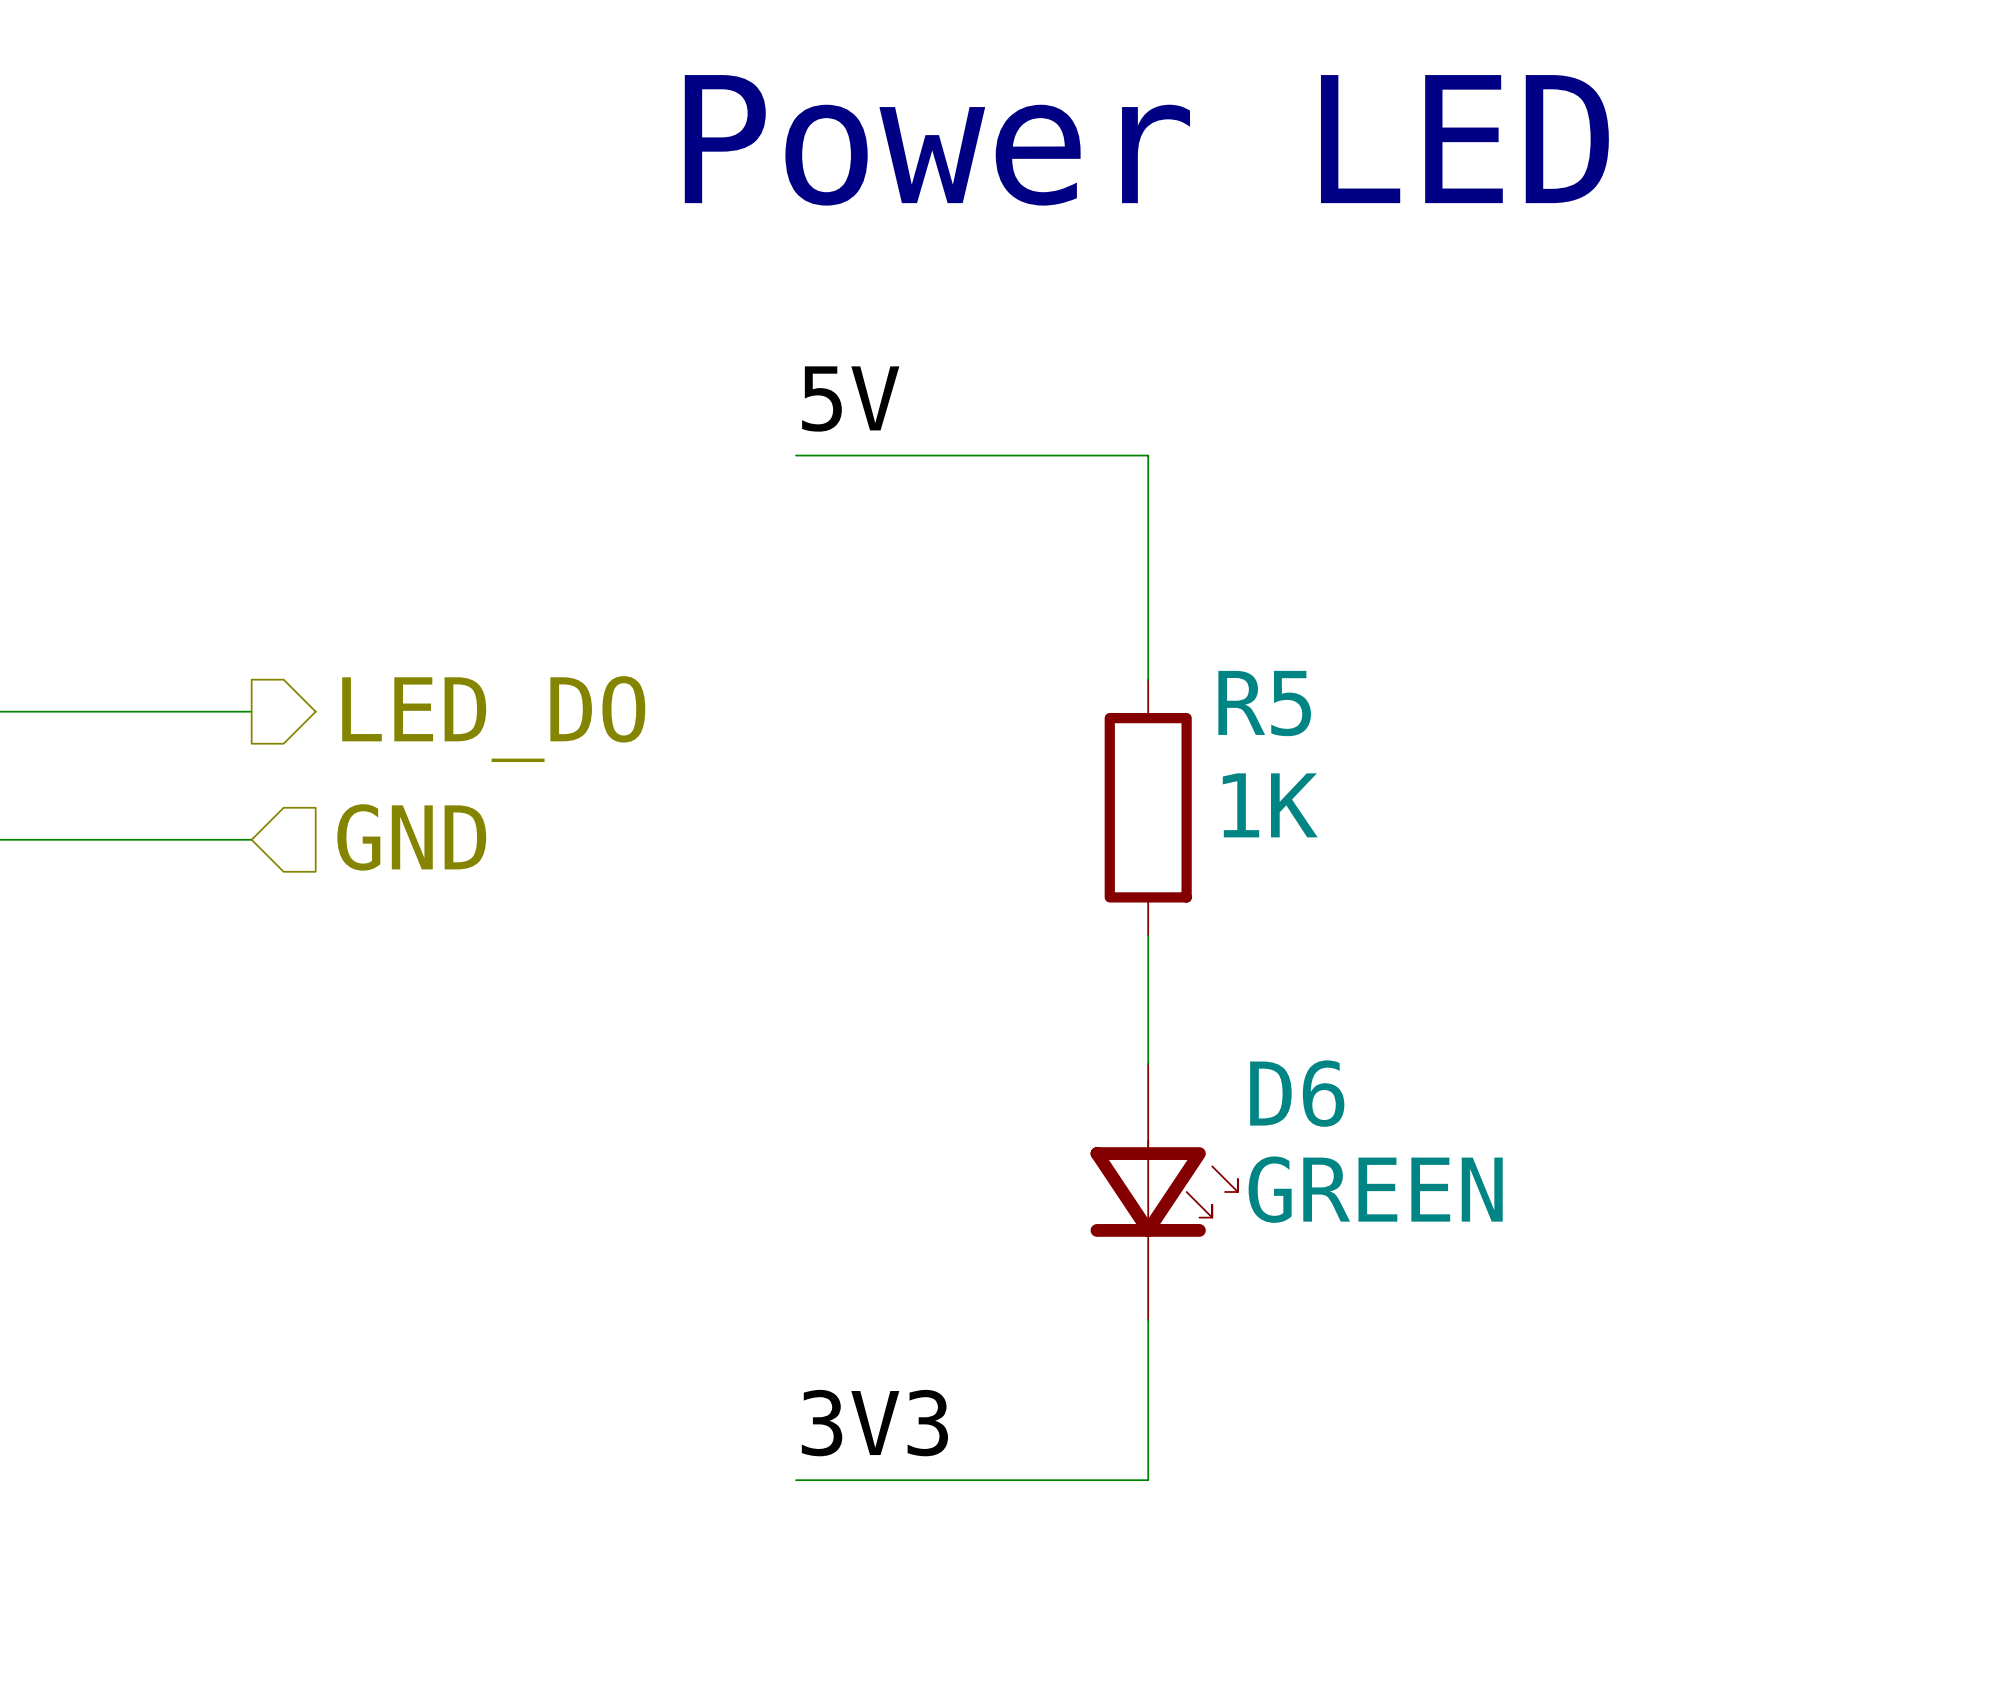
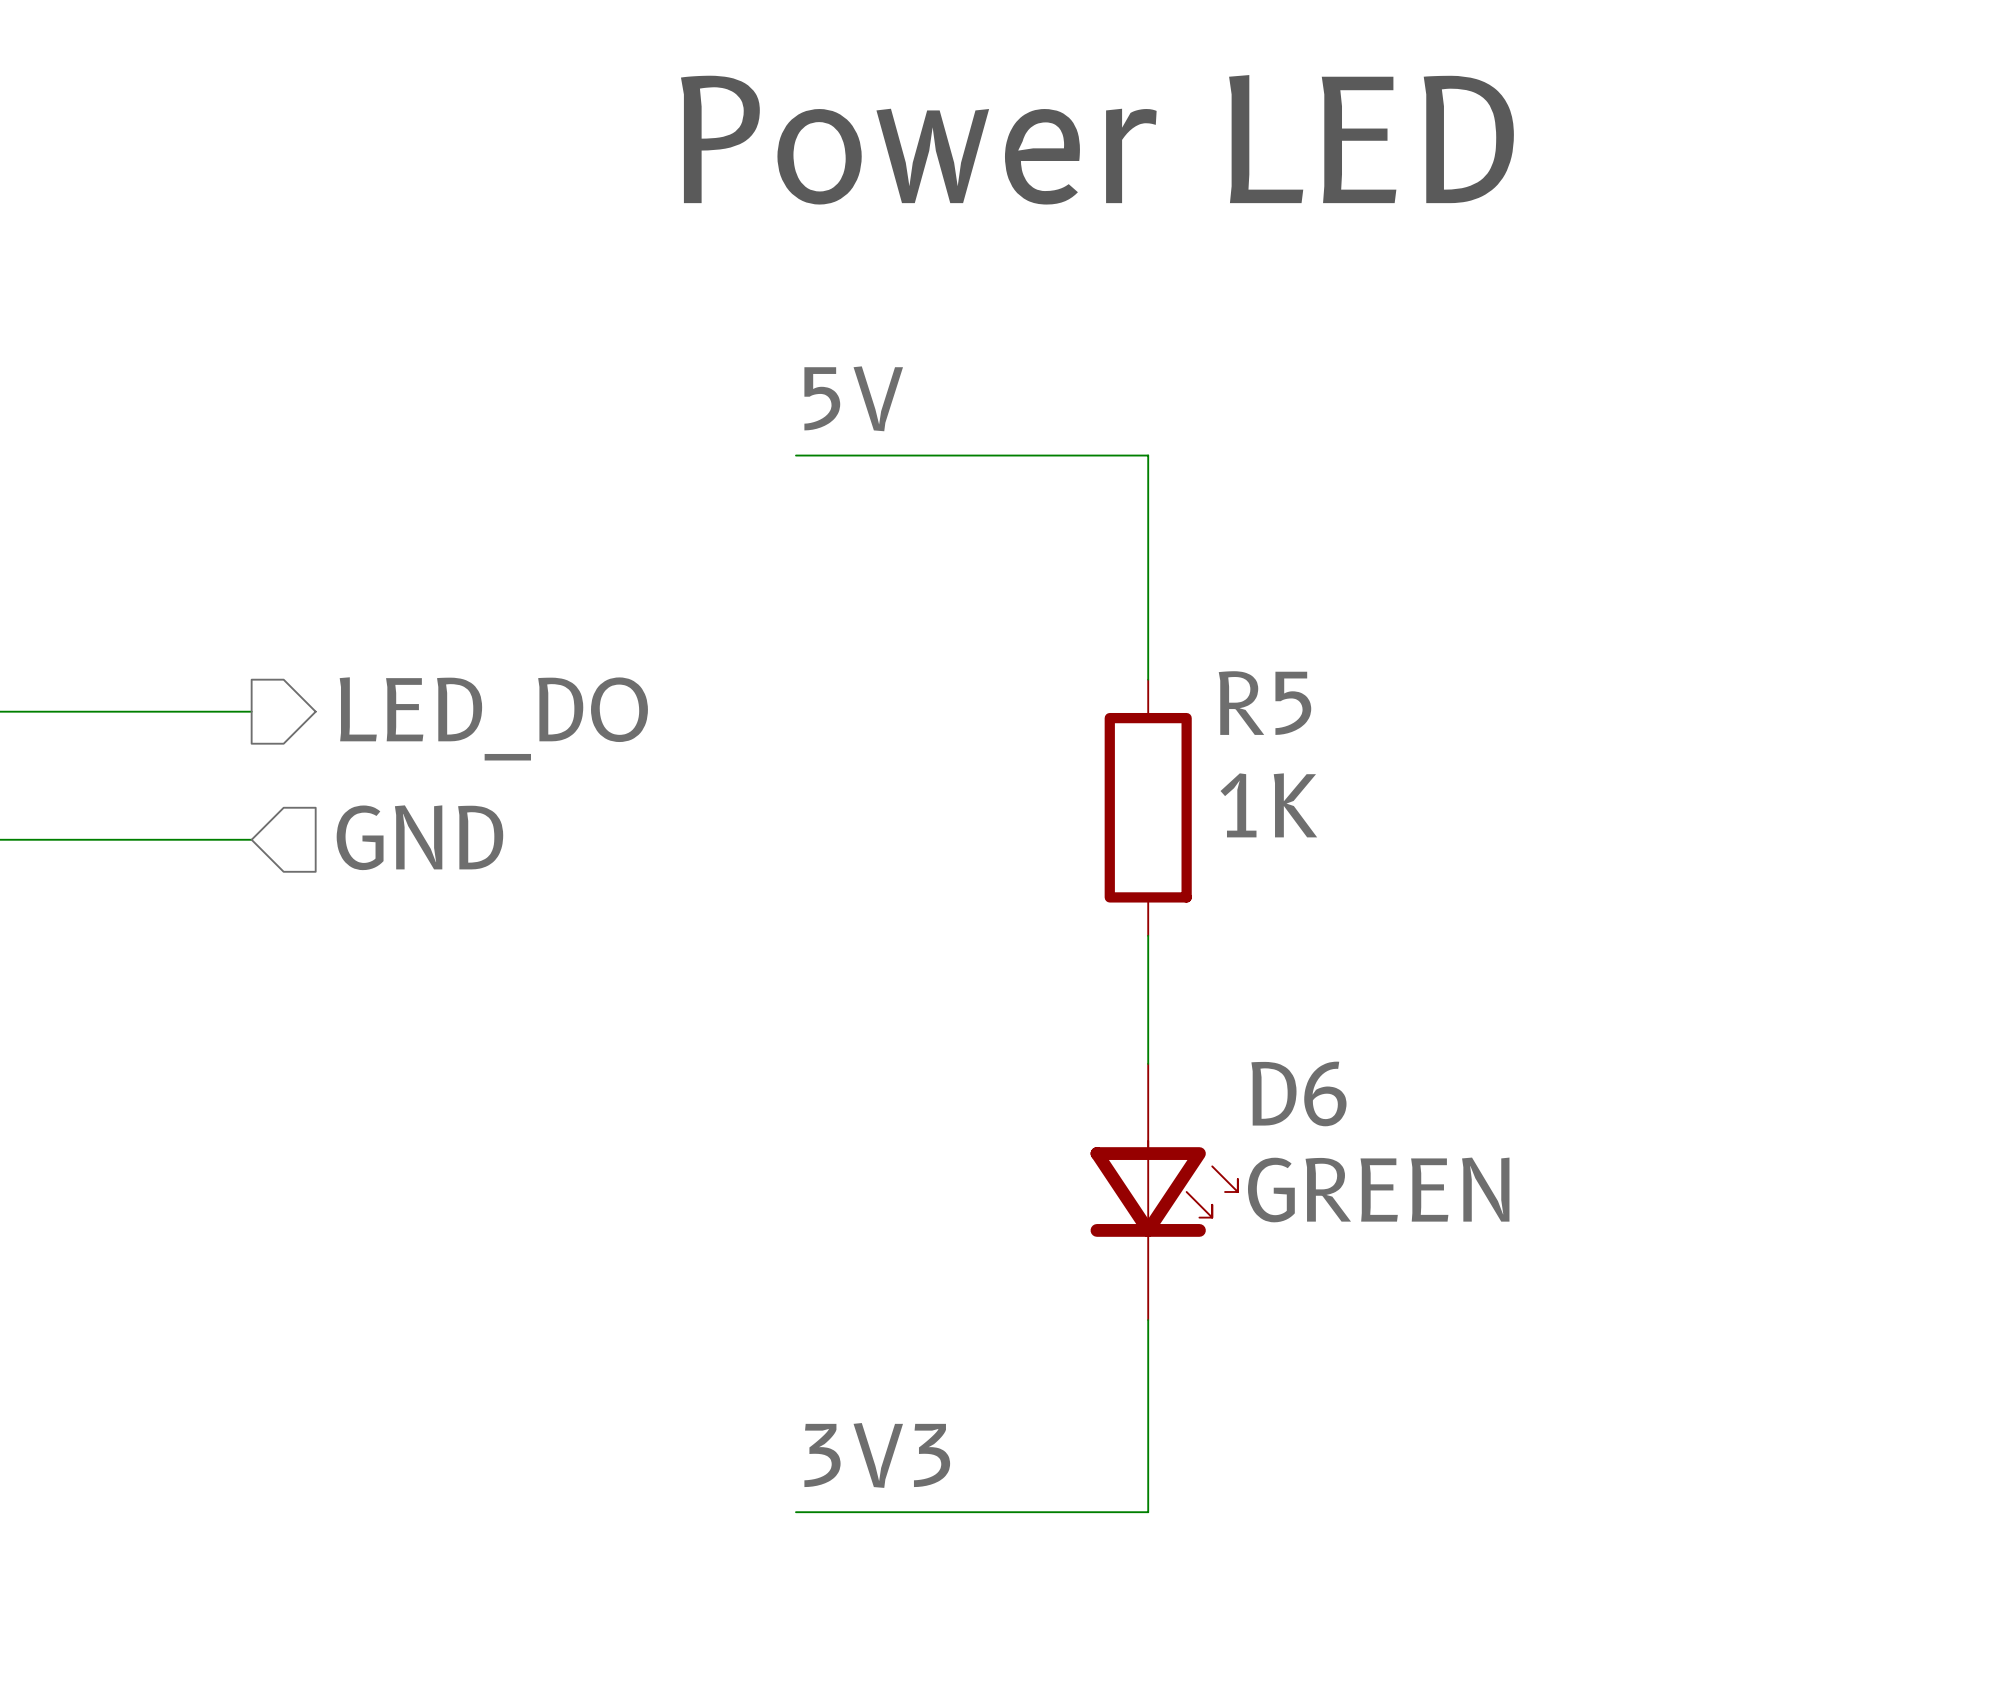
label position: 3V3 (874, 1423) -> 3V3 (877, 1455)
wire: (795, 1480) (1148, 1480) -> (795, 1512) (1148, 1512) (1148, 1480)

